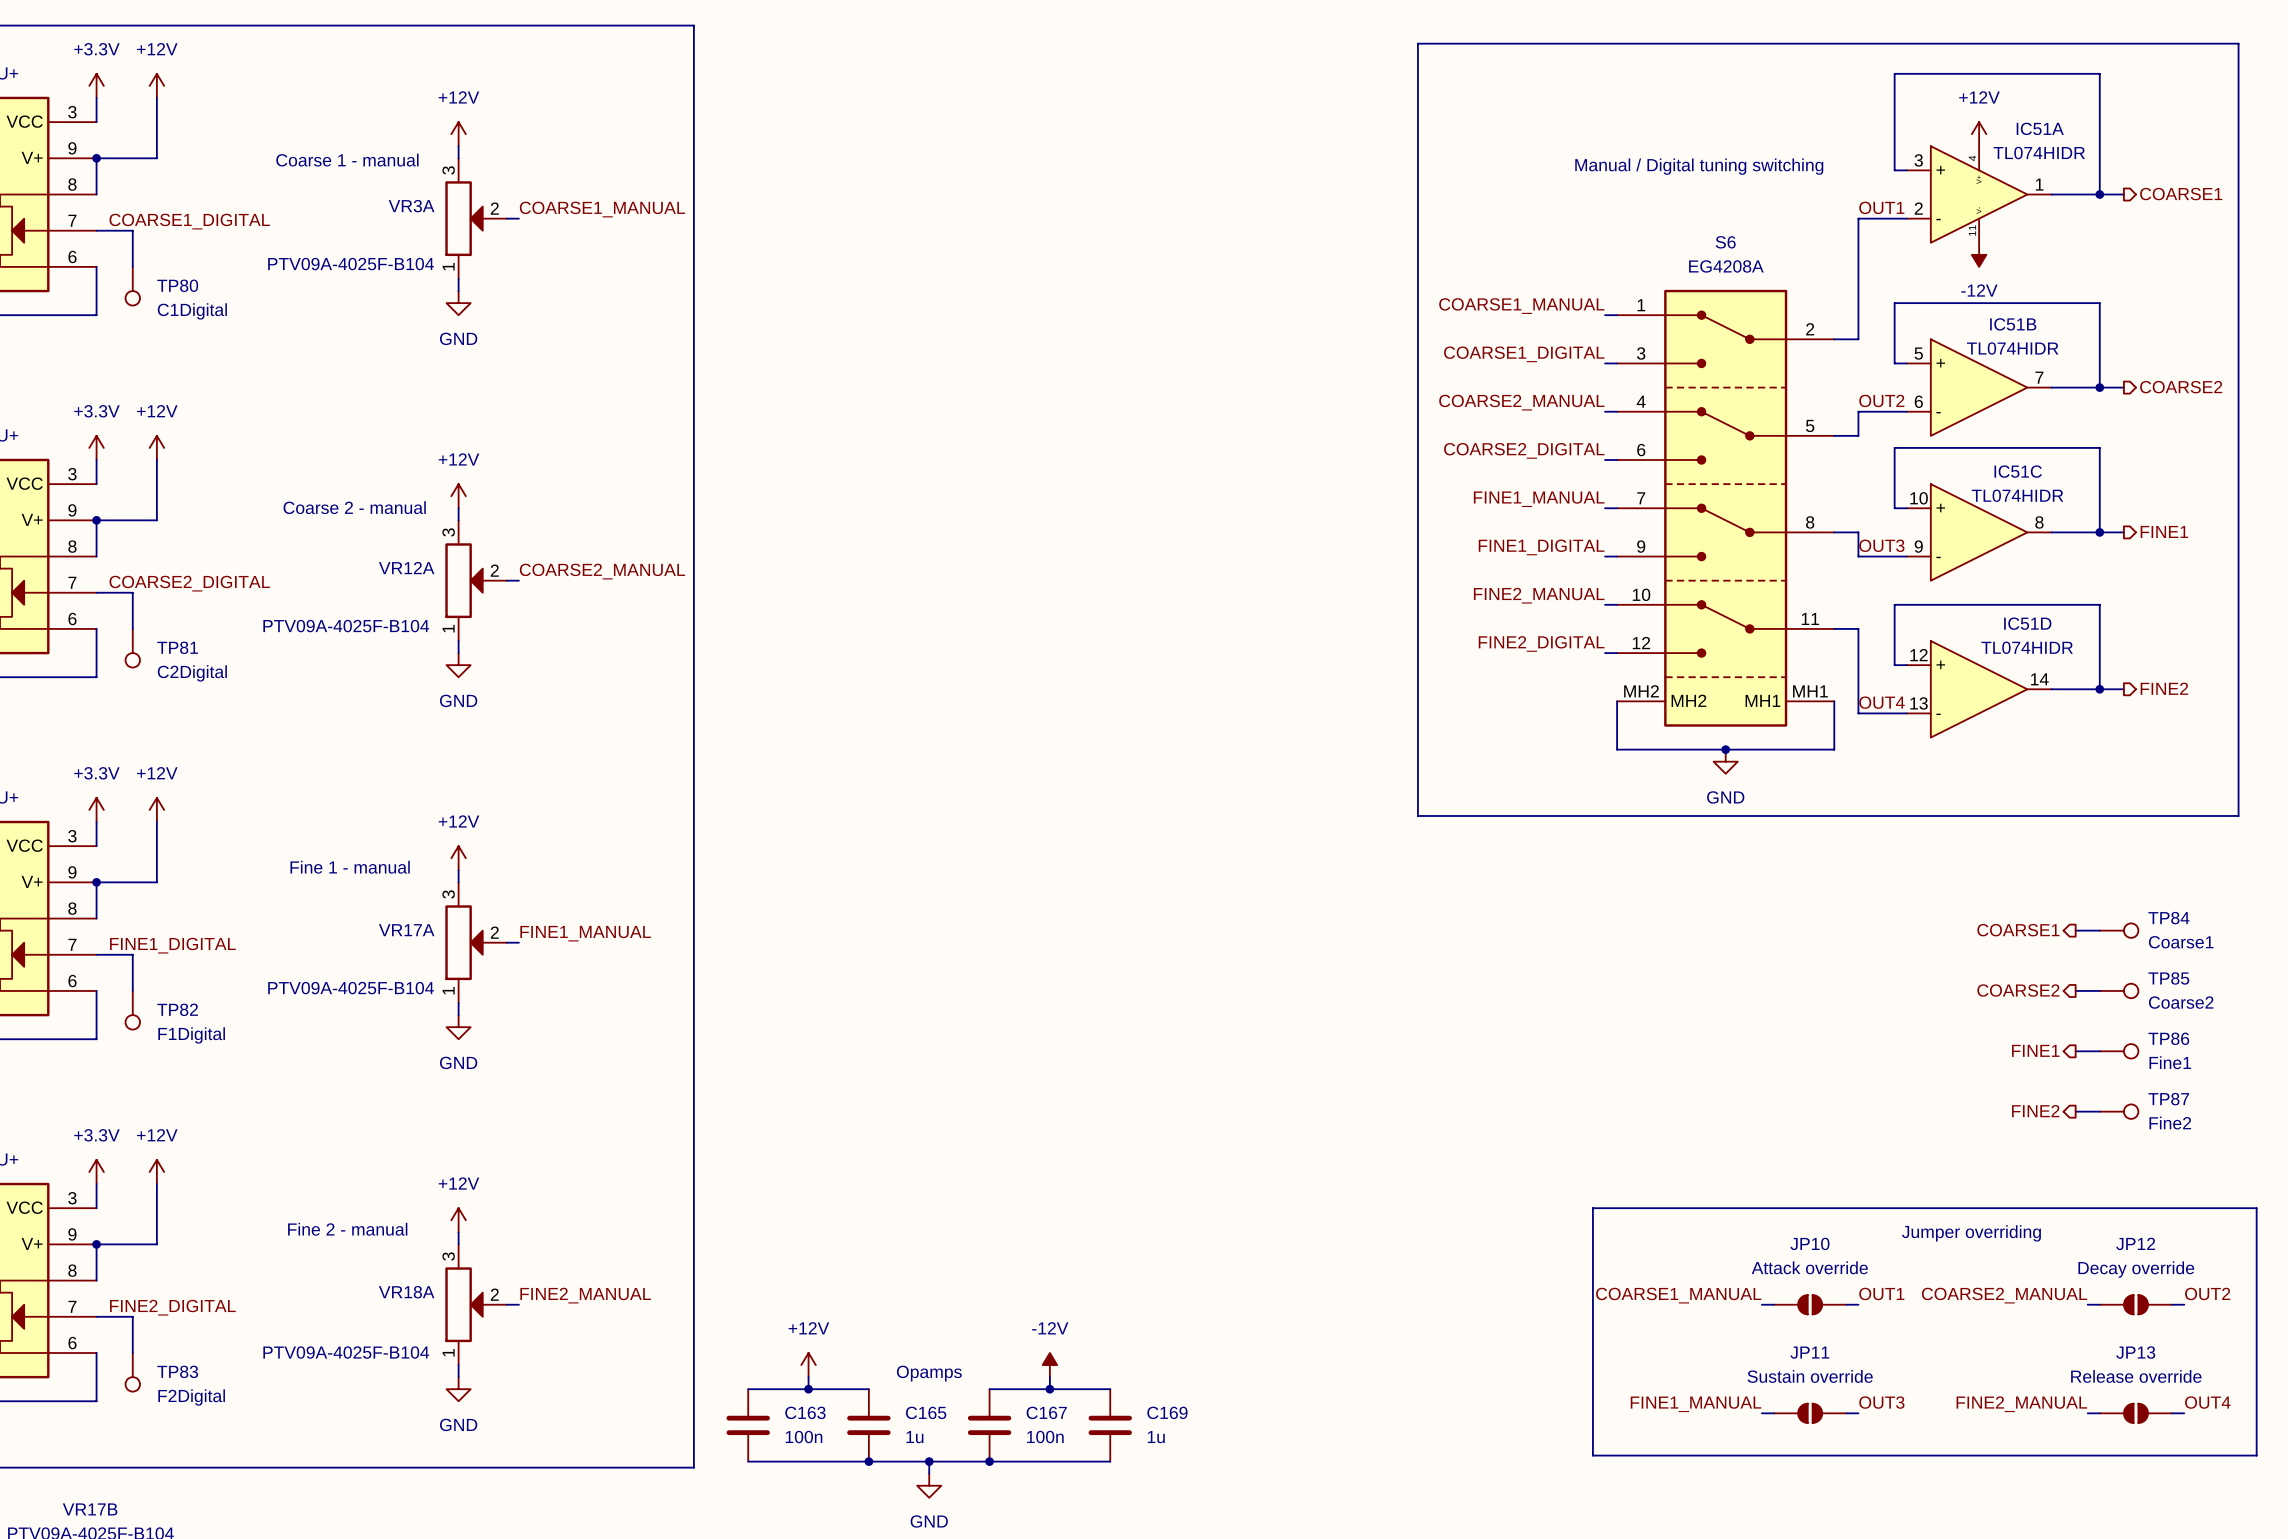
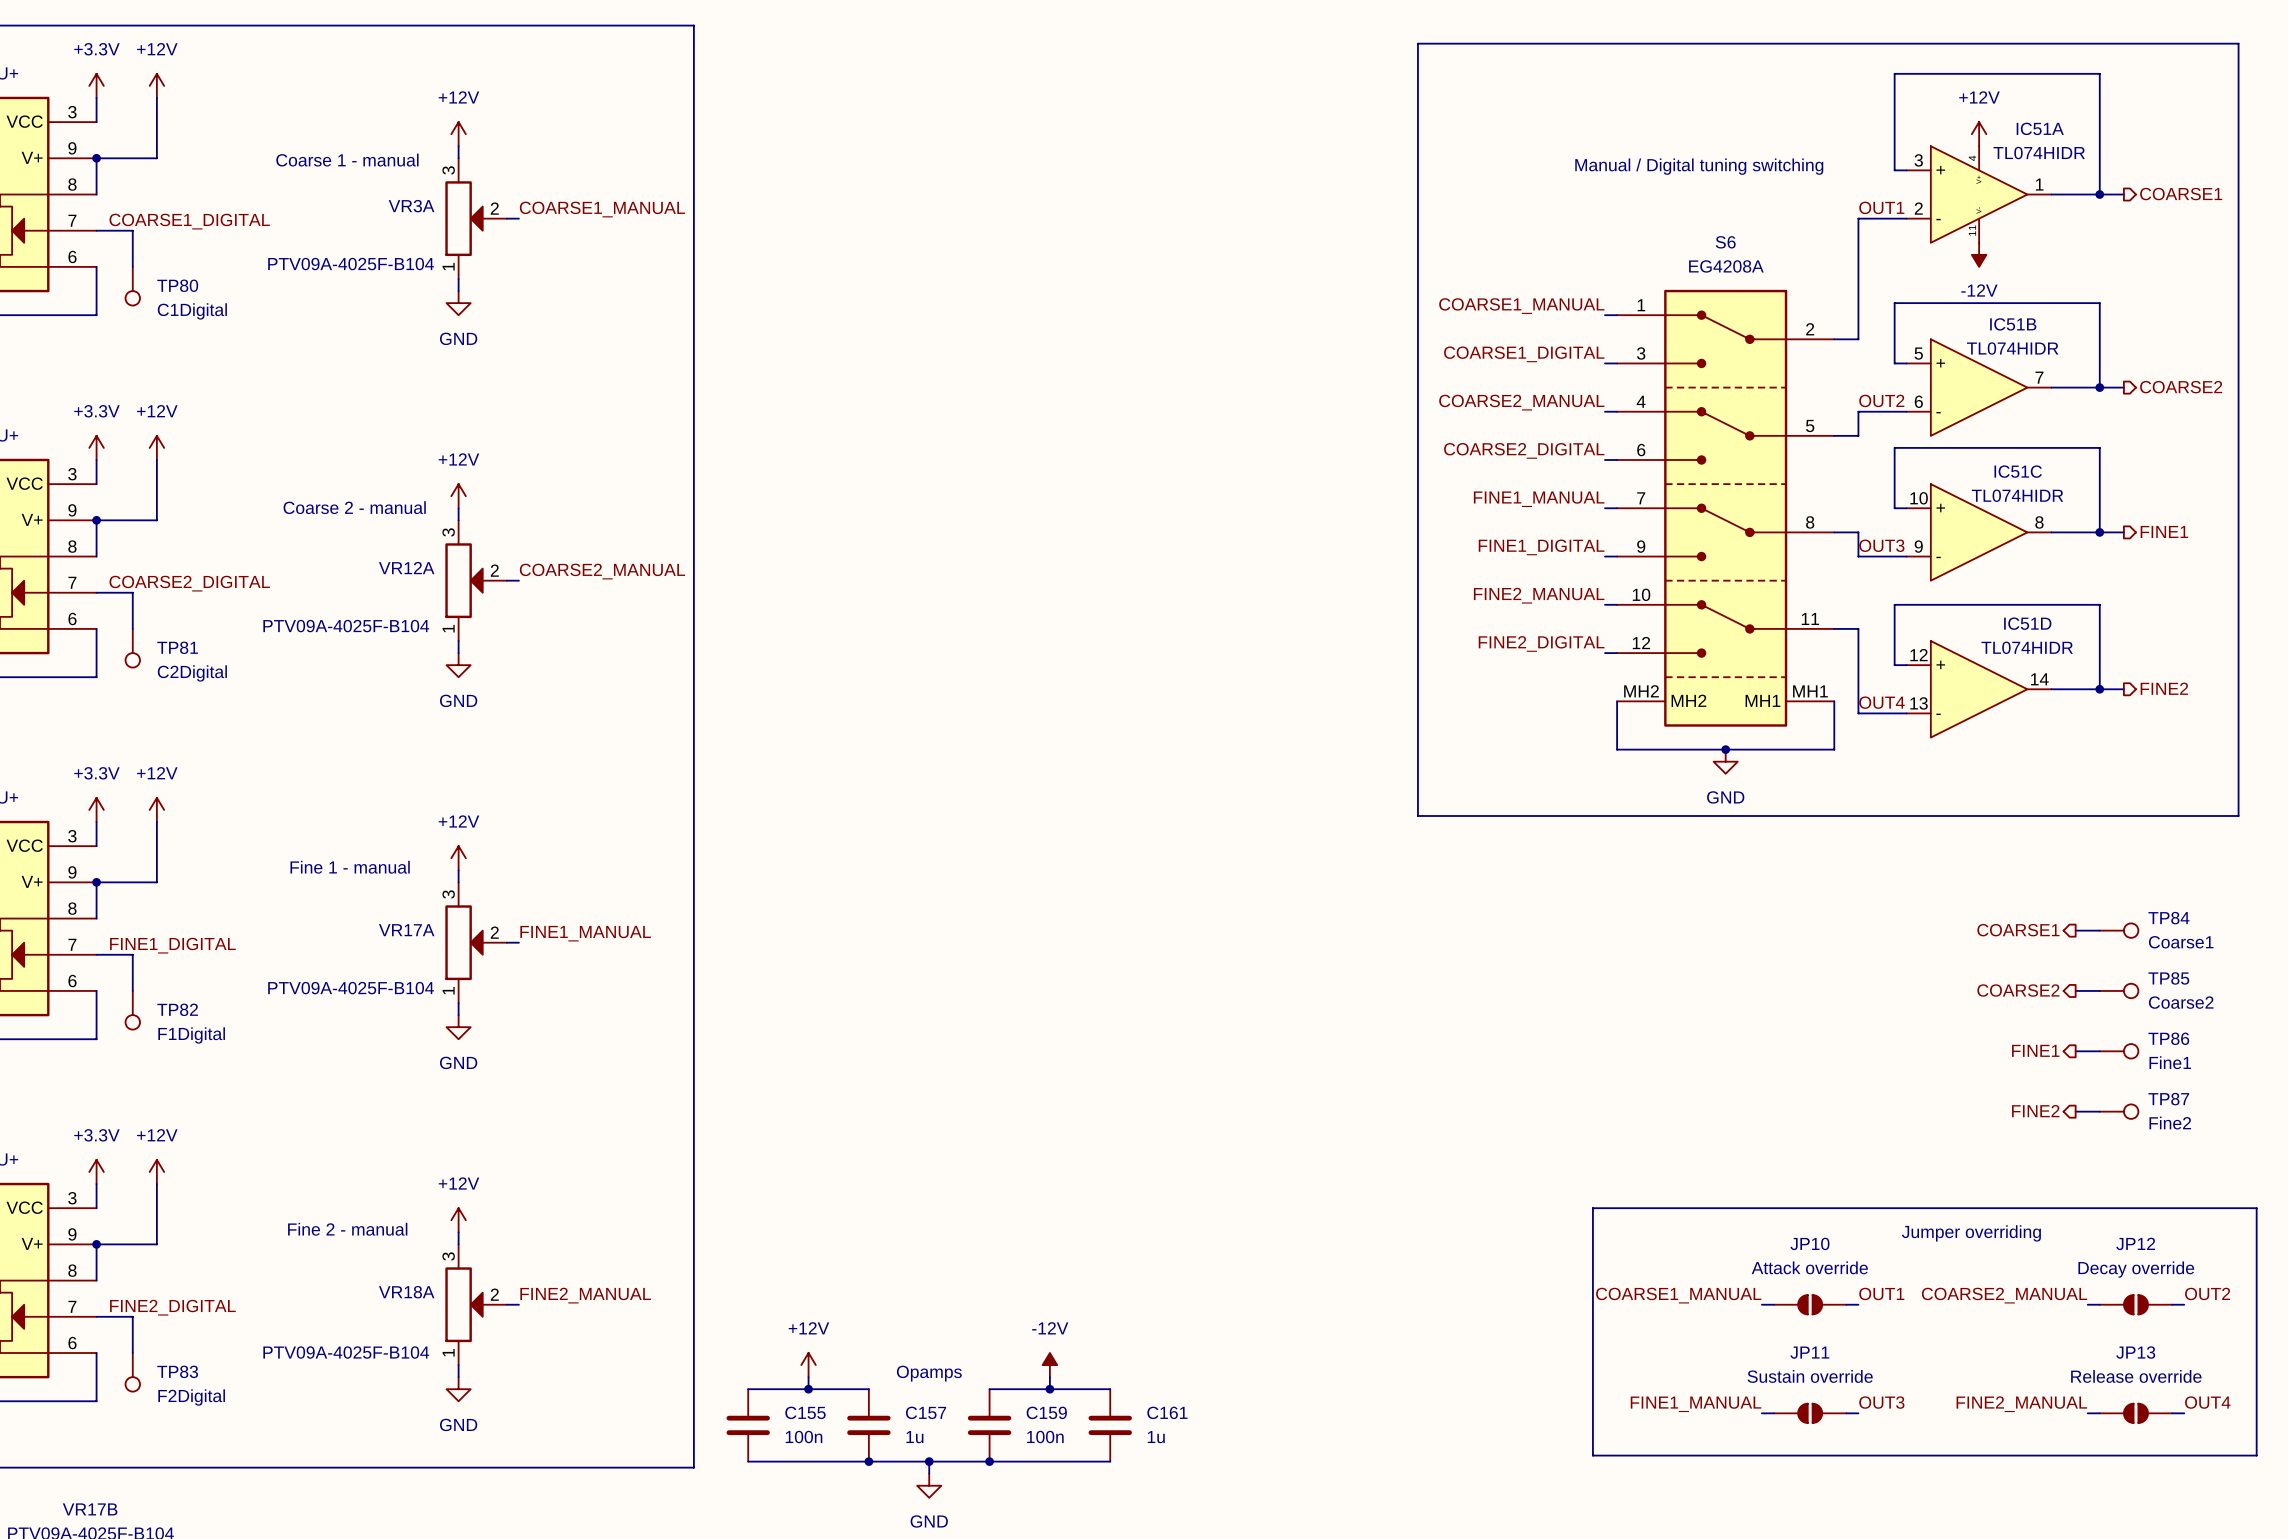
C163 name: C163 (805, 1412) -> C155 (805, 1412)
C165 name: C165 (926, 1412) -> C157 (926, 1412)
C167 name: C167 (1046, 1412) -> C159 (1046, 1412)
C169 name: C169 (1167, 1412) -> C161 (1167, 1412)

